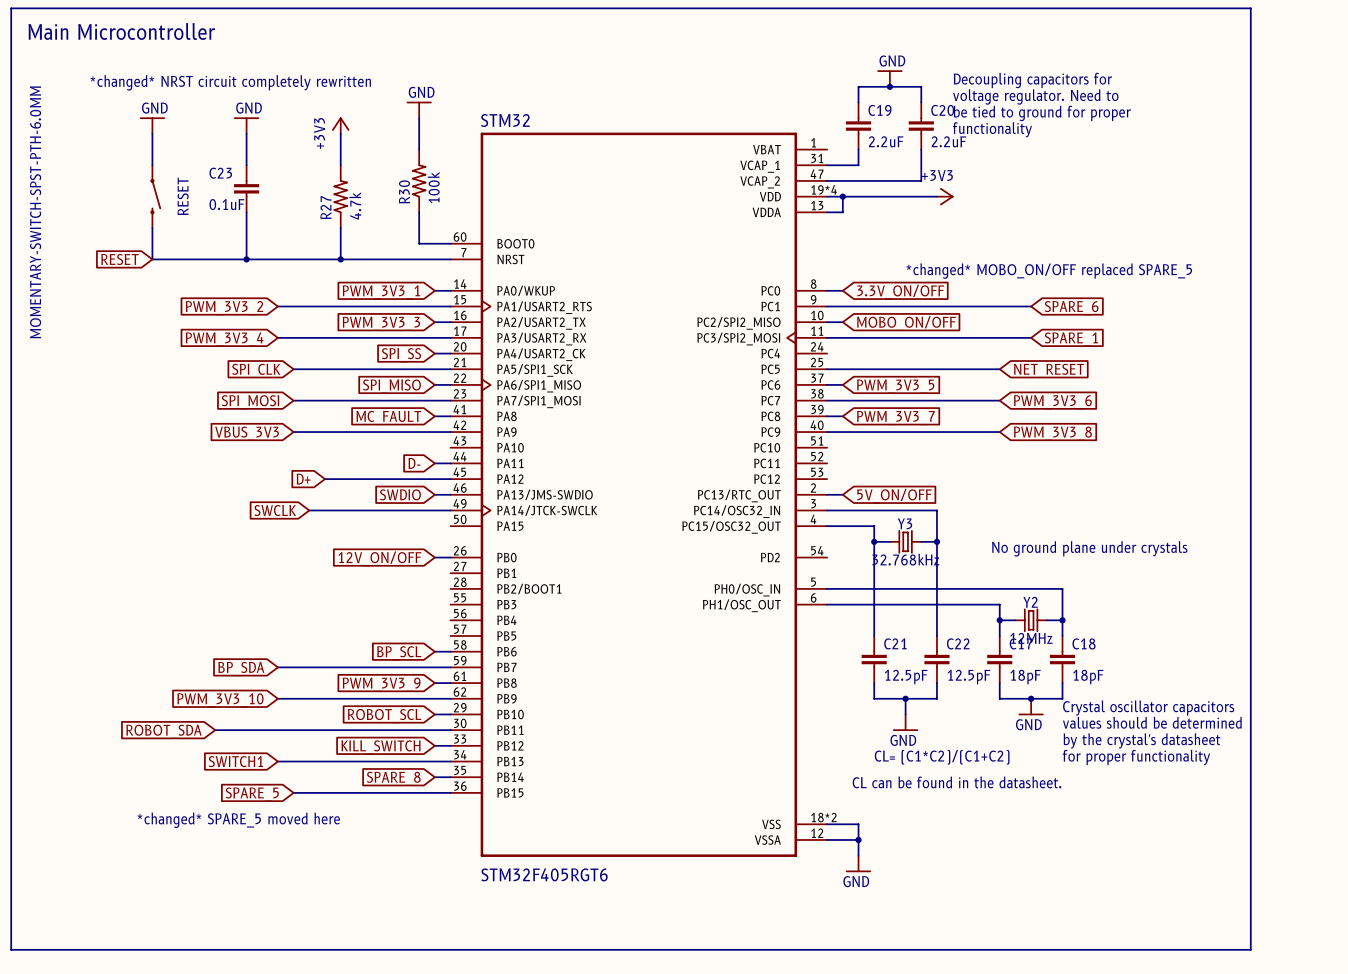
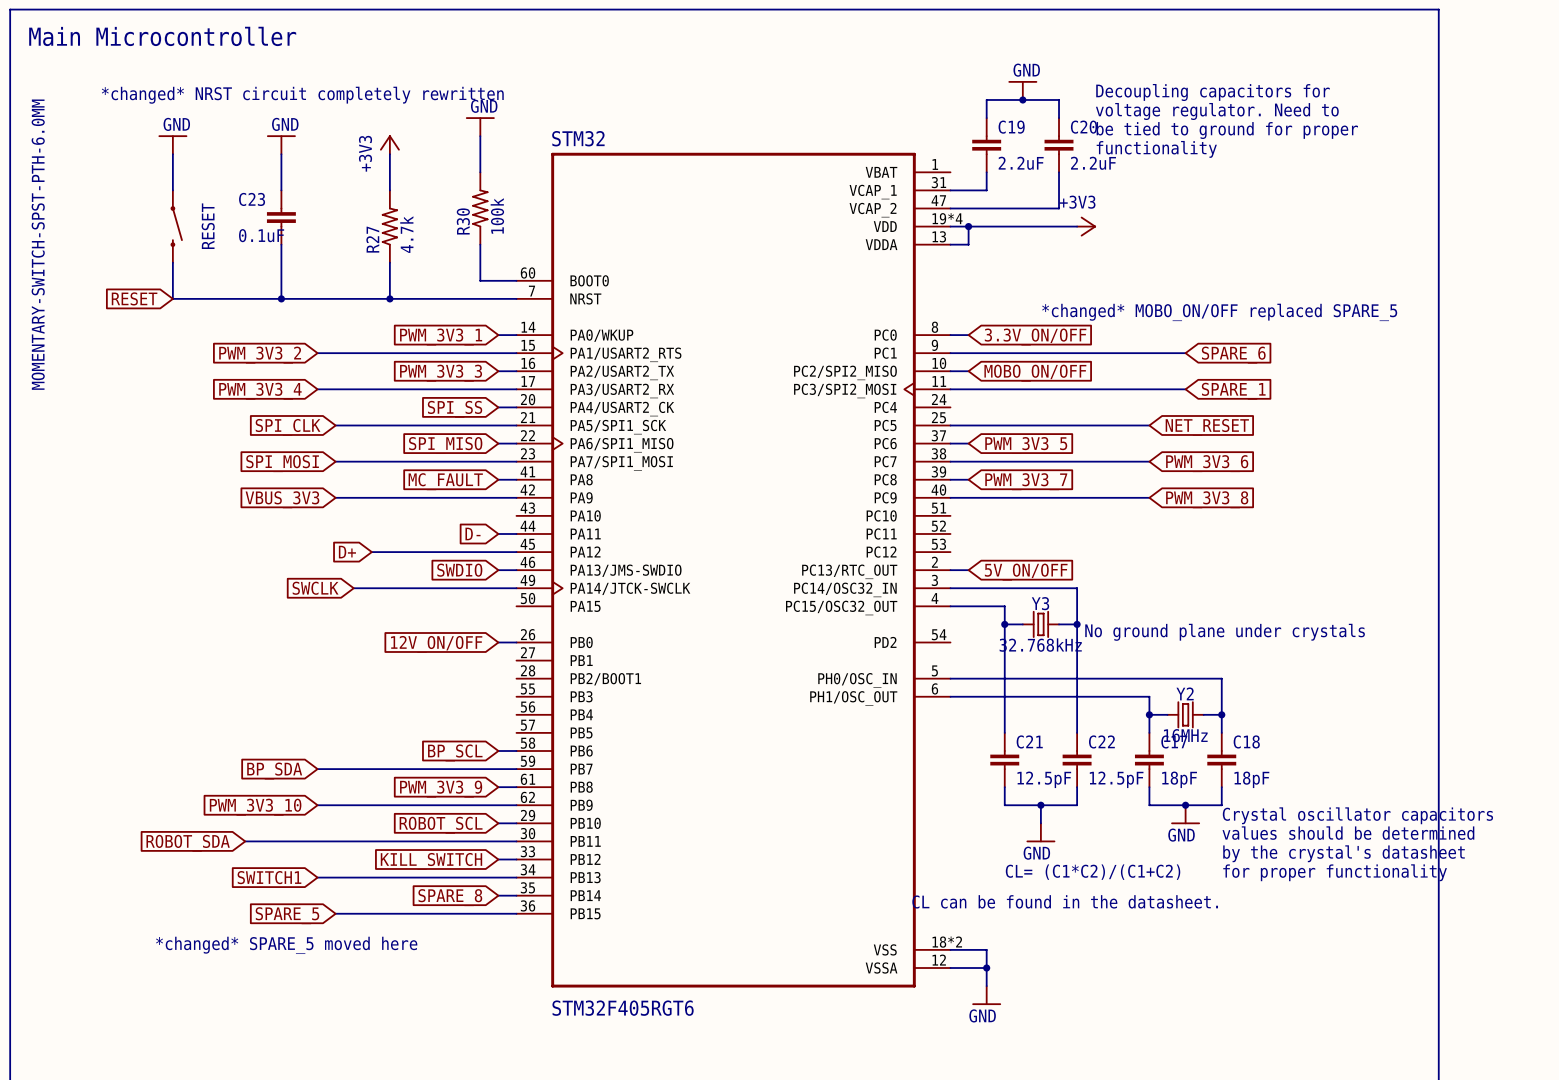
Y2 value: 12MHz (1031, 638) -> 16MHz (1185, 735)

